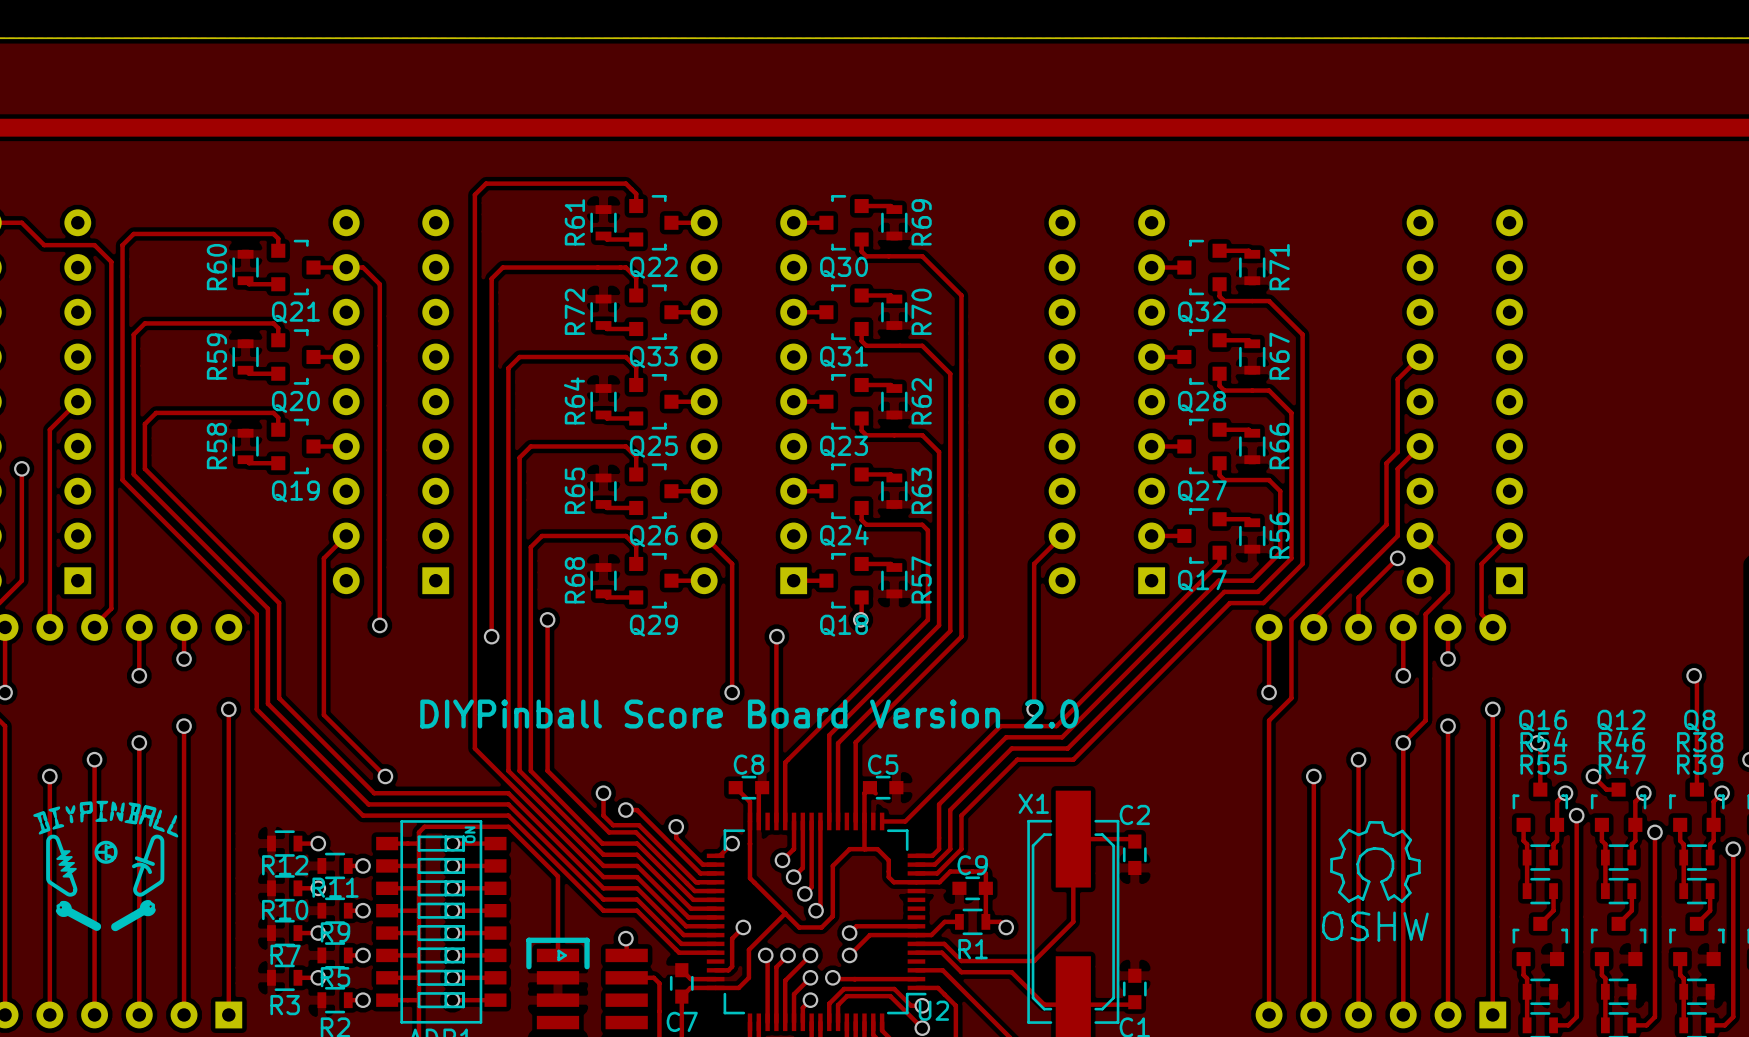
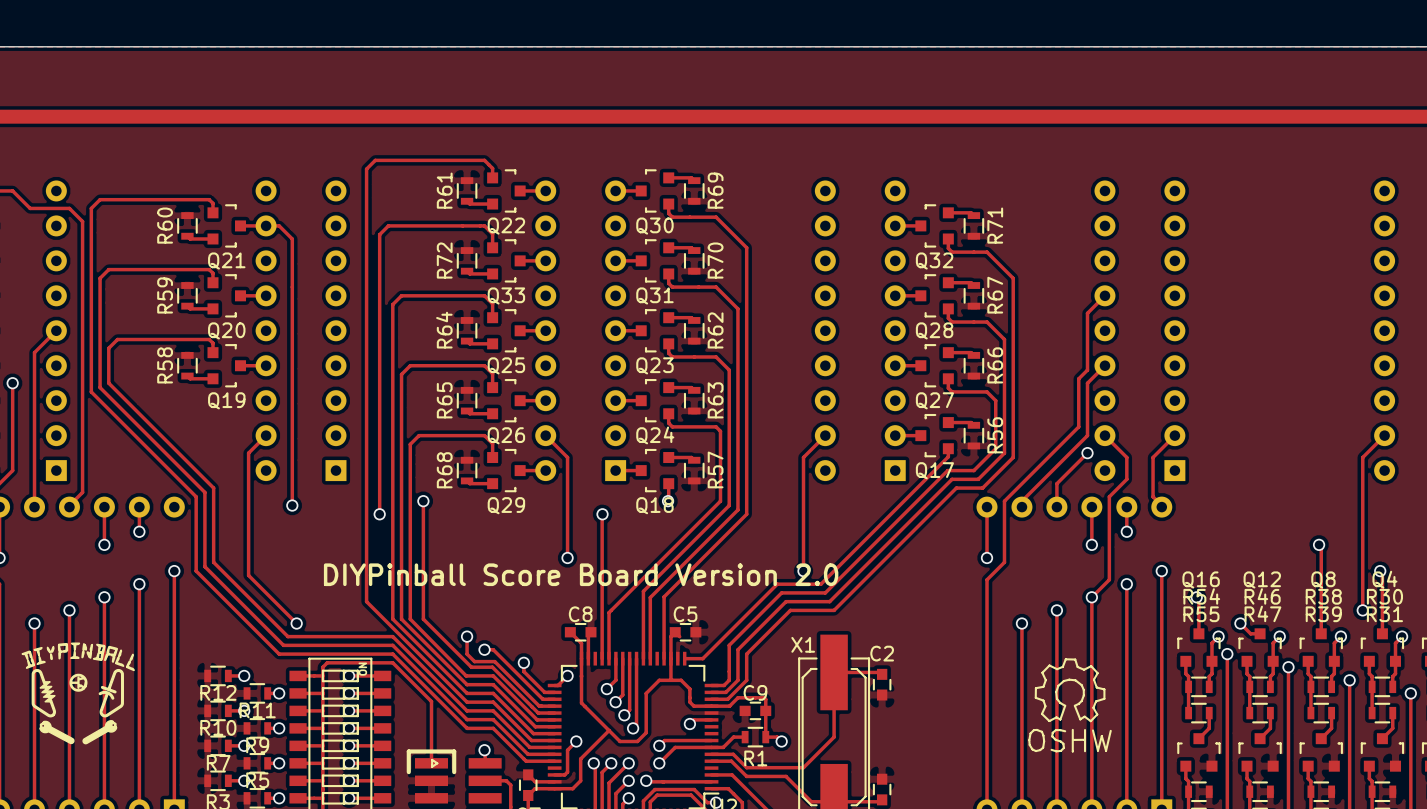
track: none -> (711, 719) (693, 719) (689, 724)
via: none -> (689, 724)

